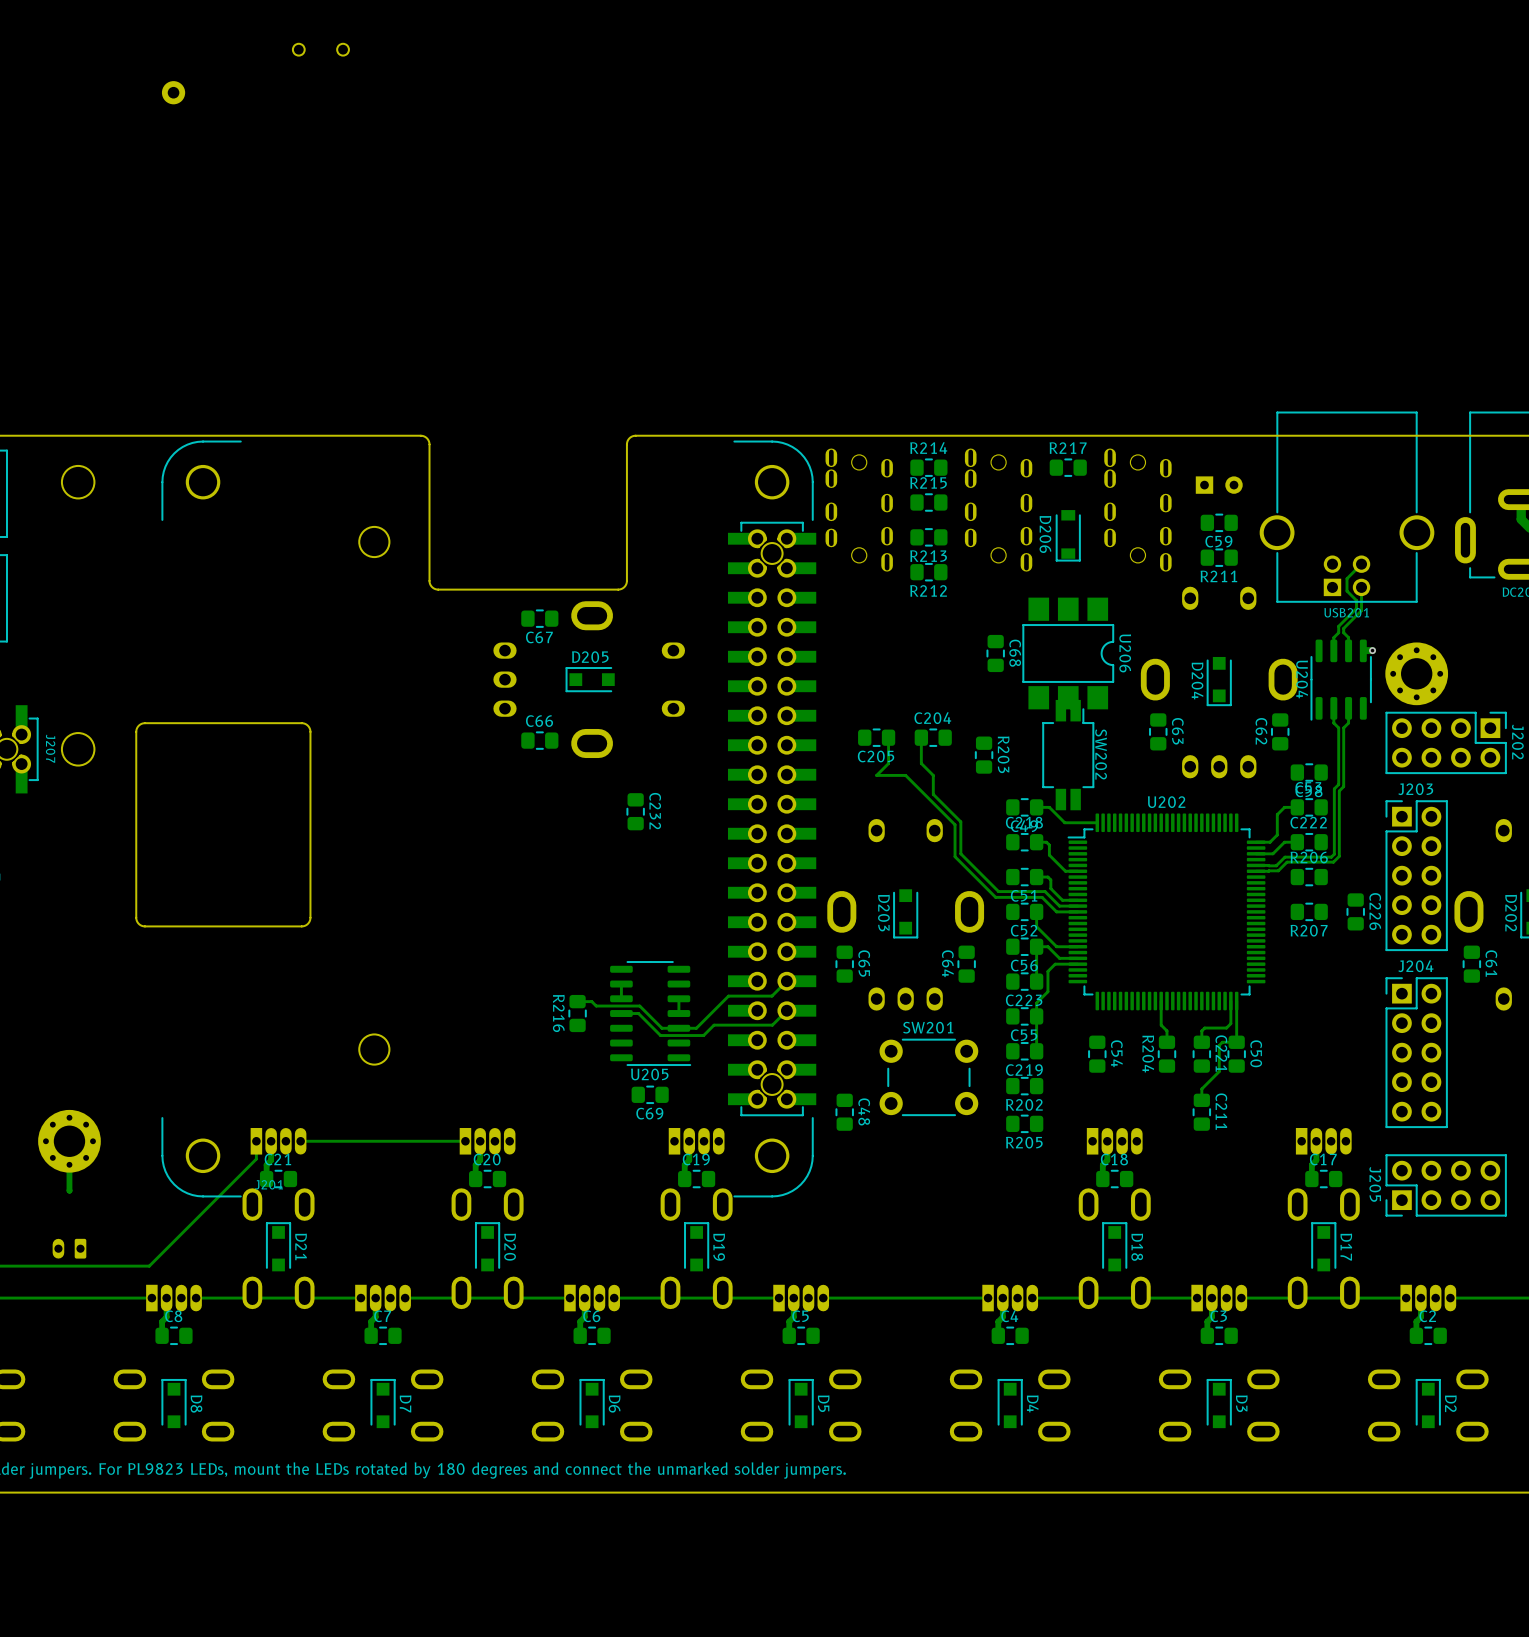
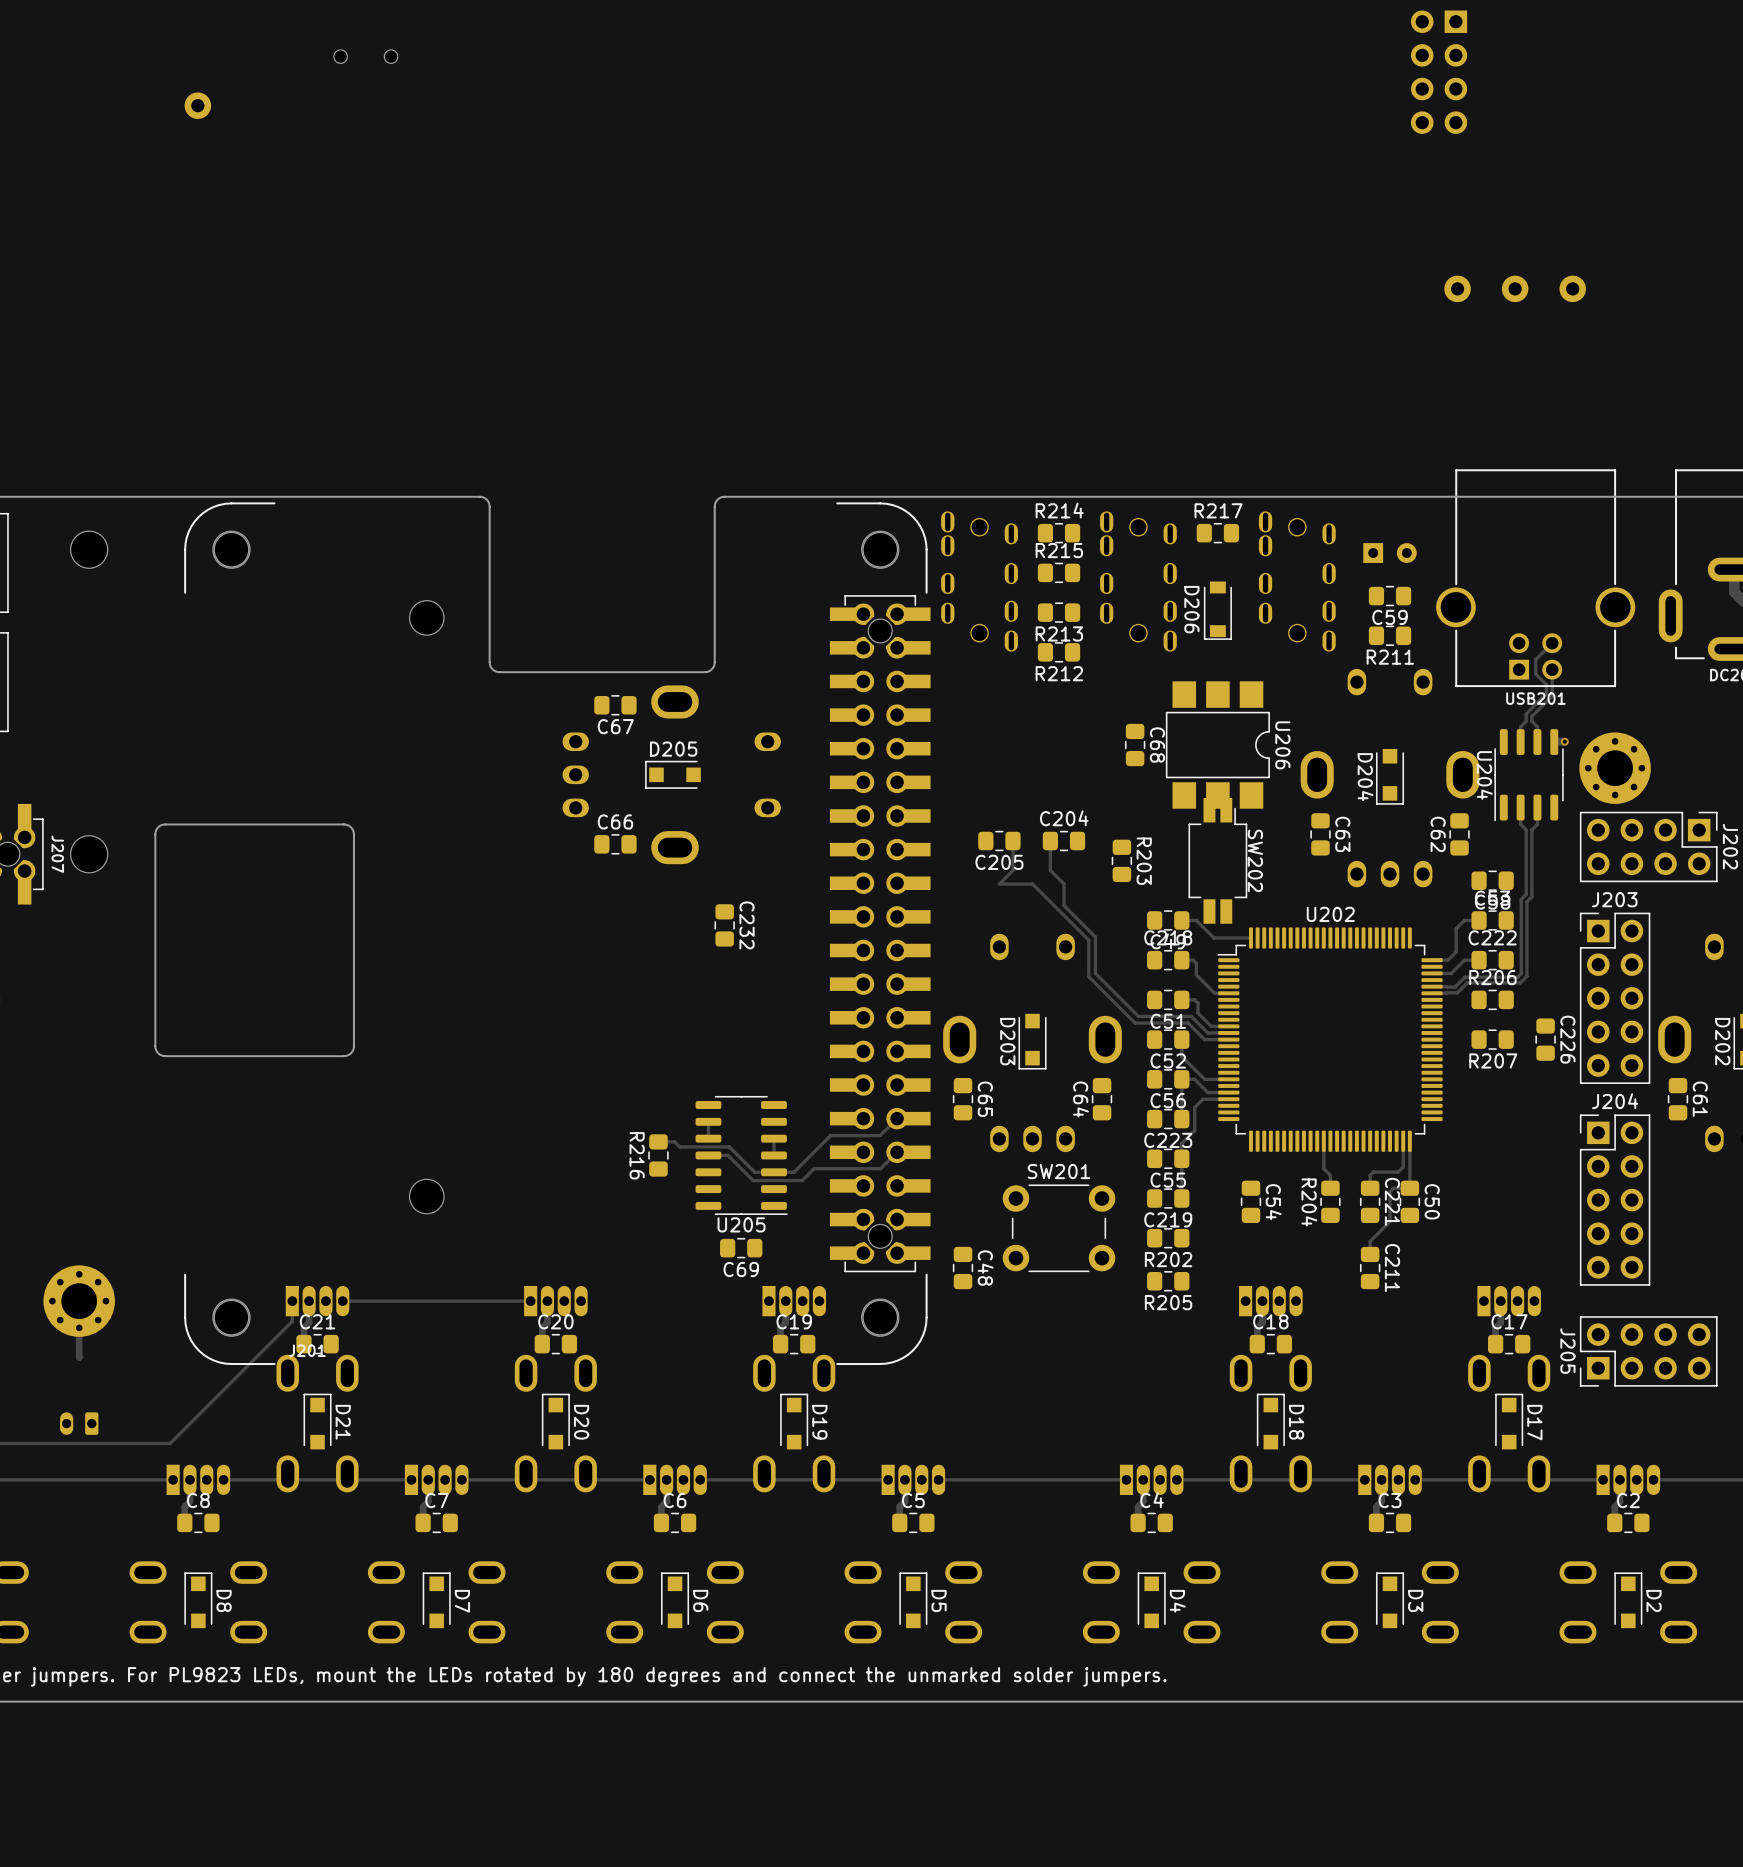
part: none -> (1439, 72)
part: none -> (1457, 288)
part: none -> (1515, 288)
part: none -> (1572, 288)

